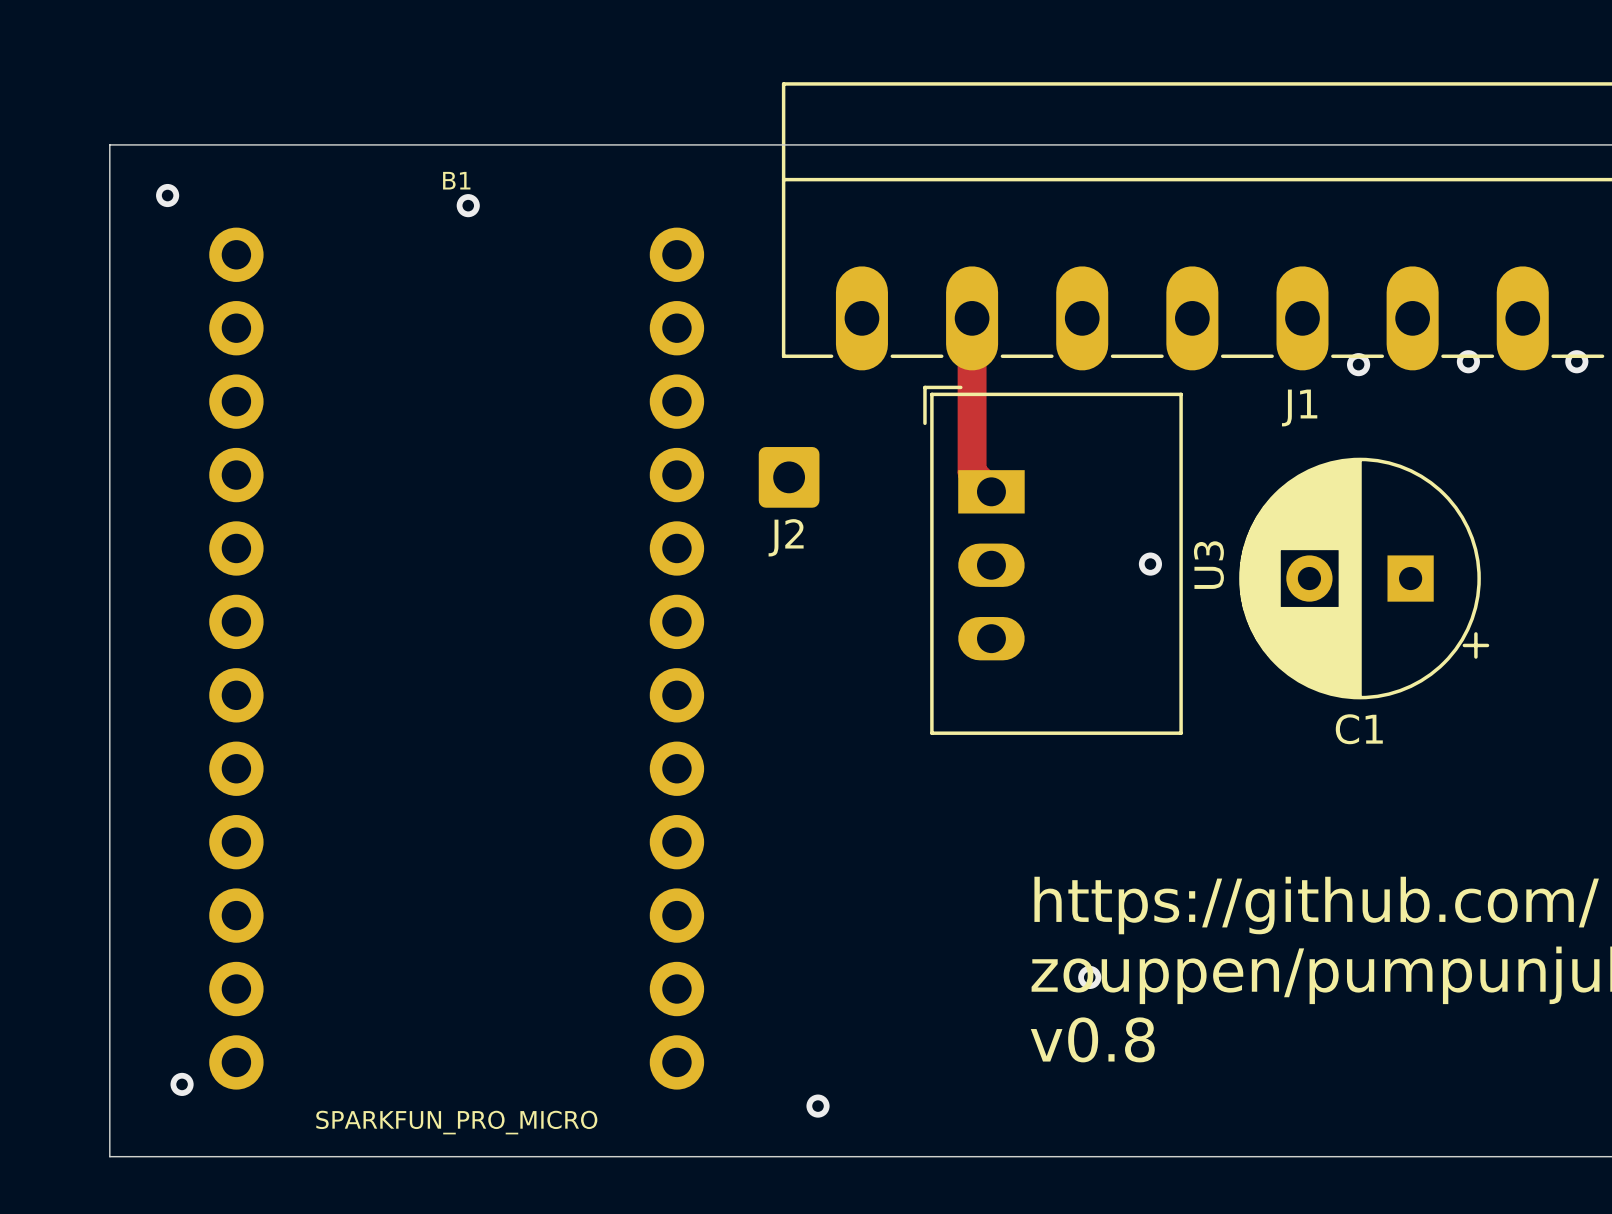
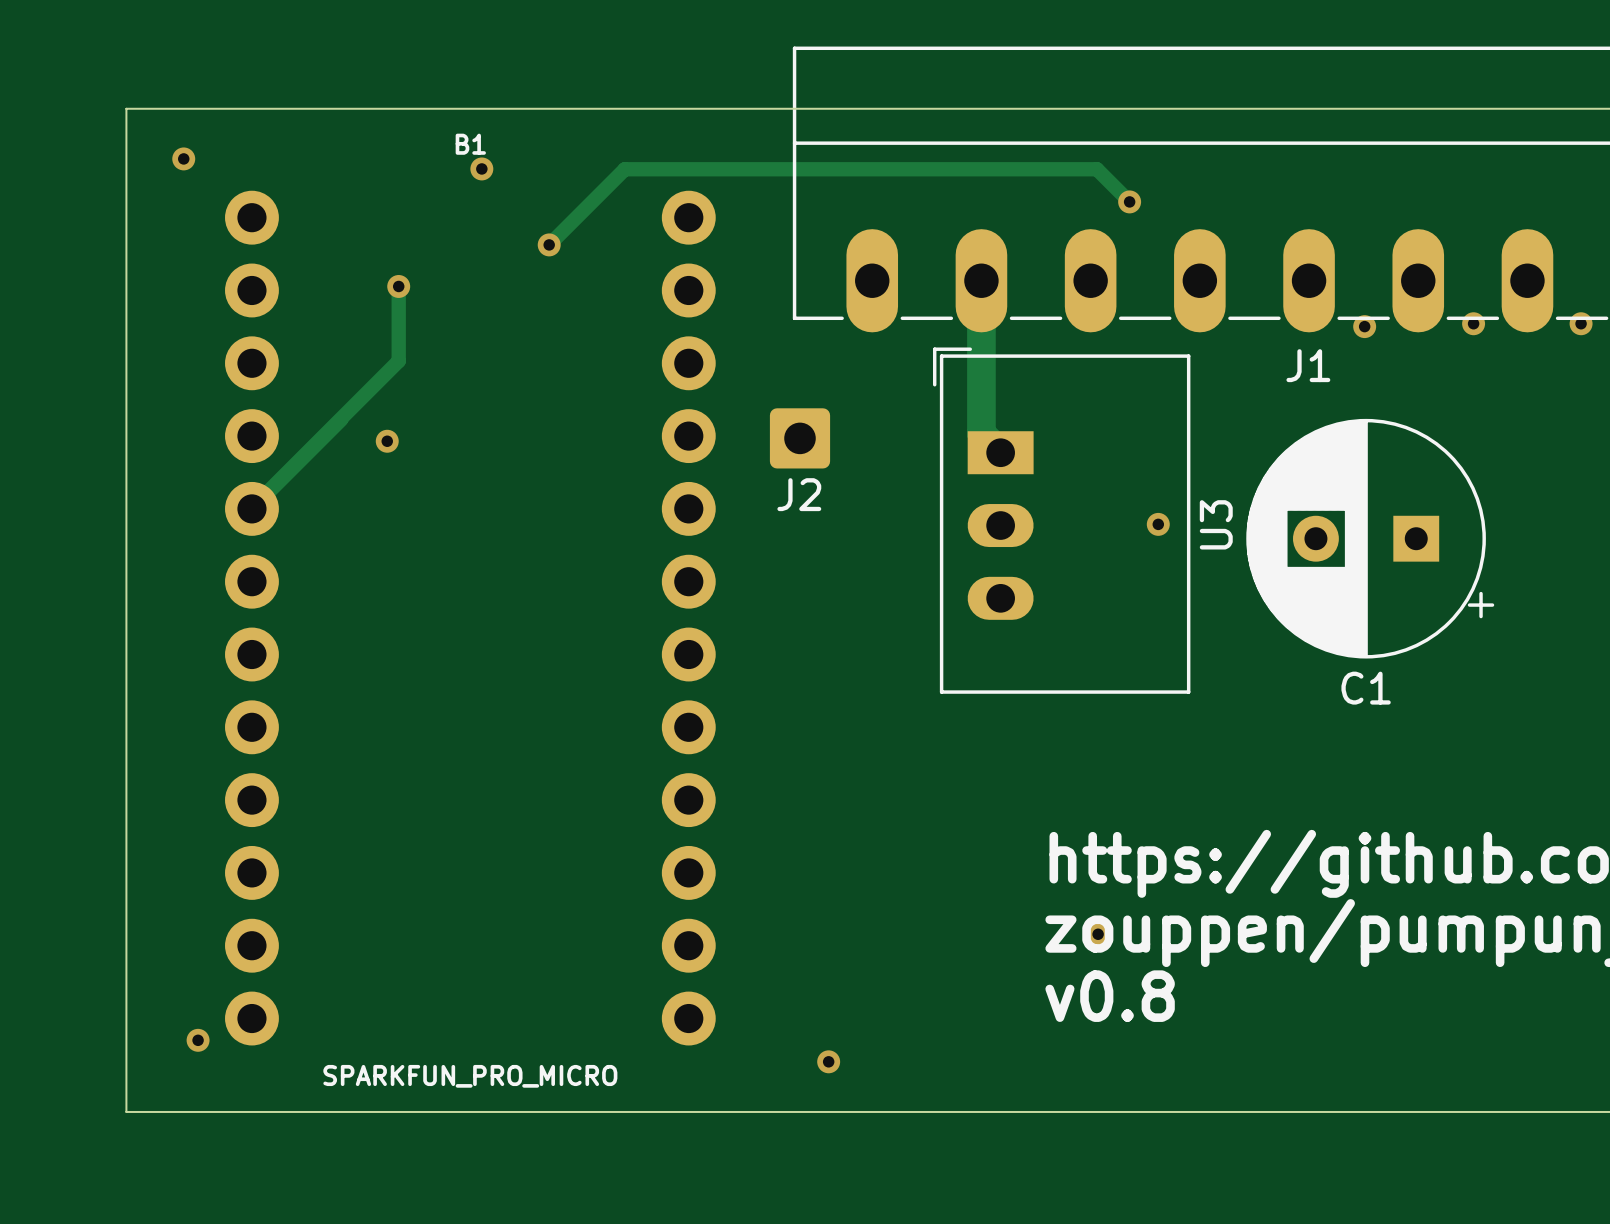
track: none -> (1129, 201) (1096, 169) (624, 169) (549, 244)
via: none -> (1129, 201)
via: none -> (549, 244)
track: none -> (398, 286) (398, 361) (251, 508) (341, 419)
via: none -> (398, 286)
via: none -> (387, 441)

